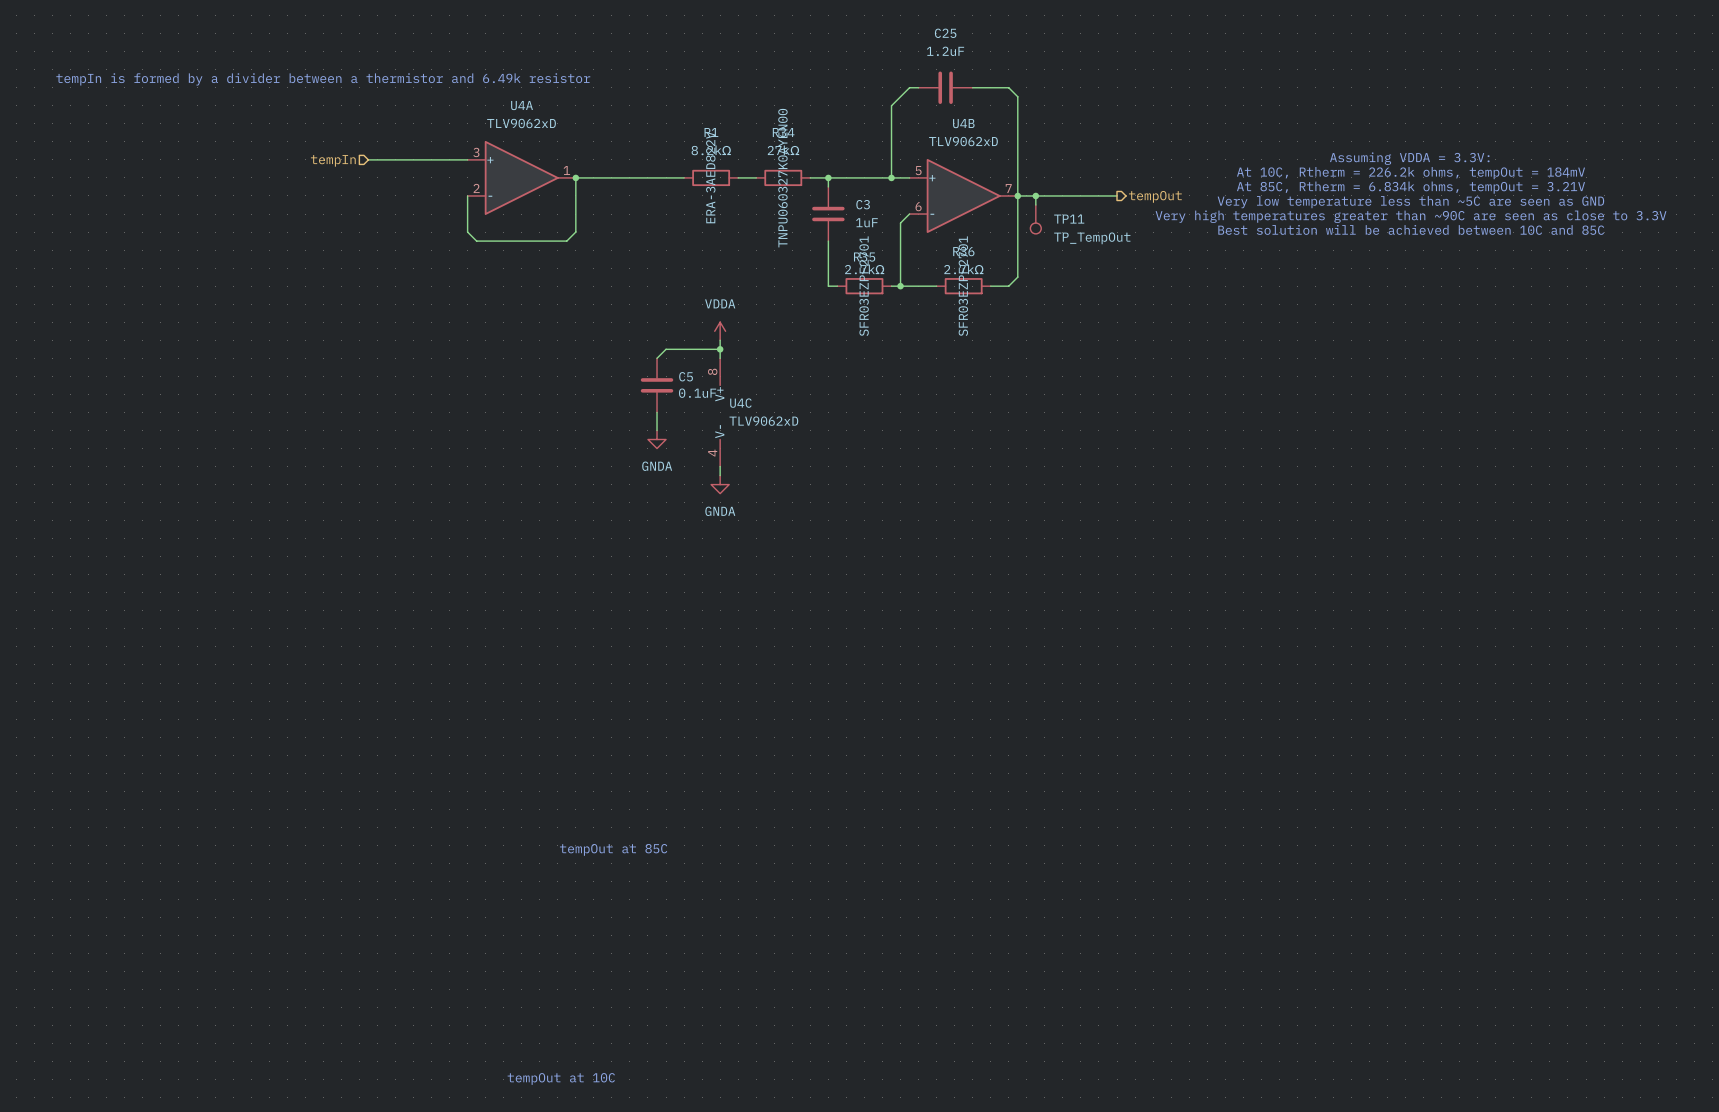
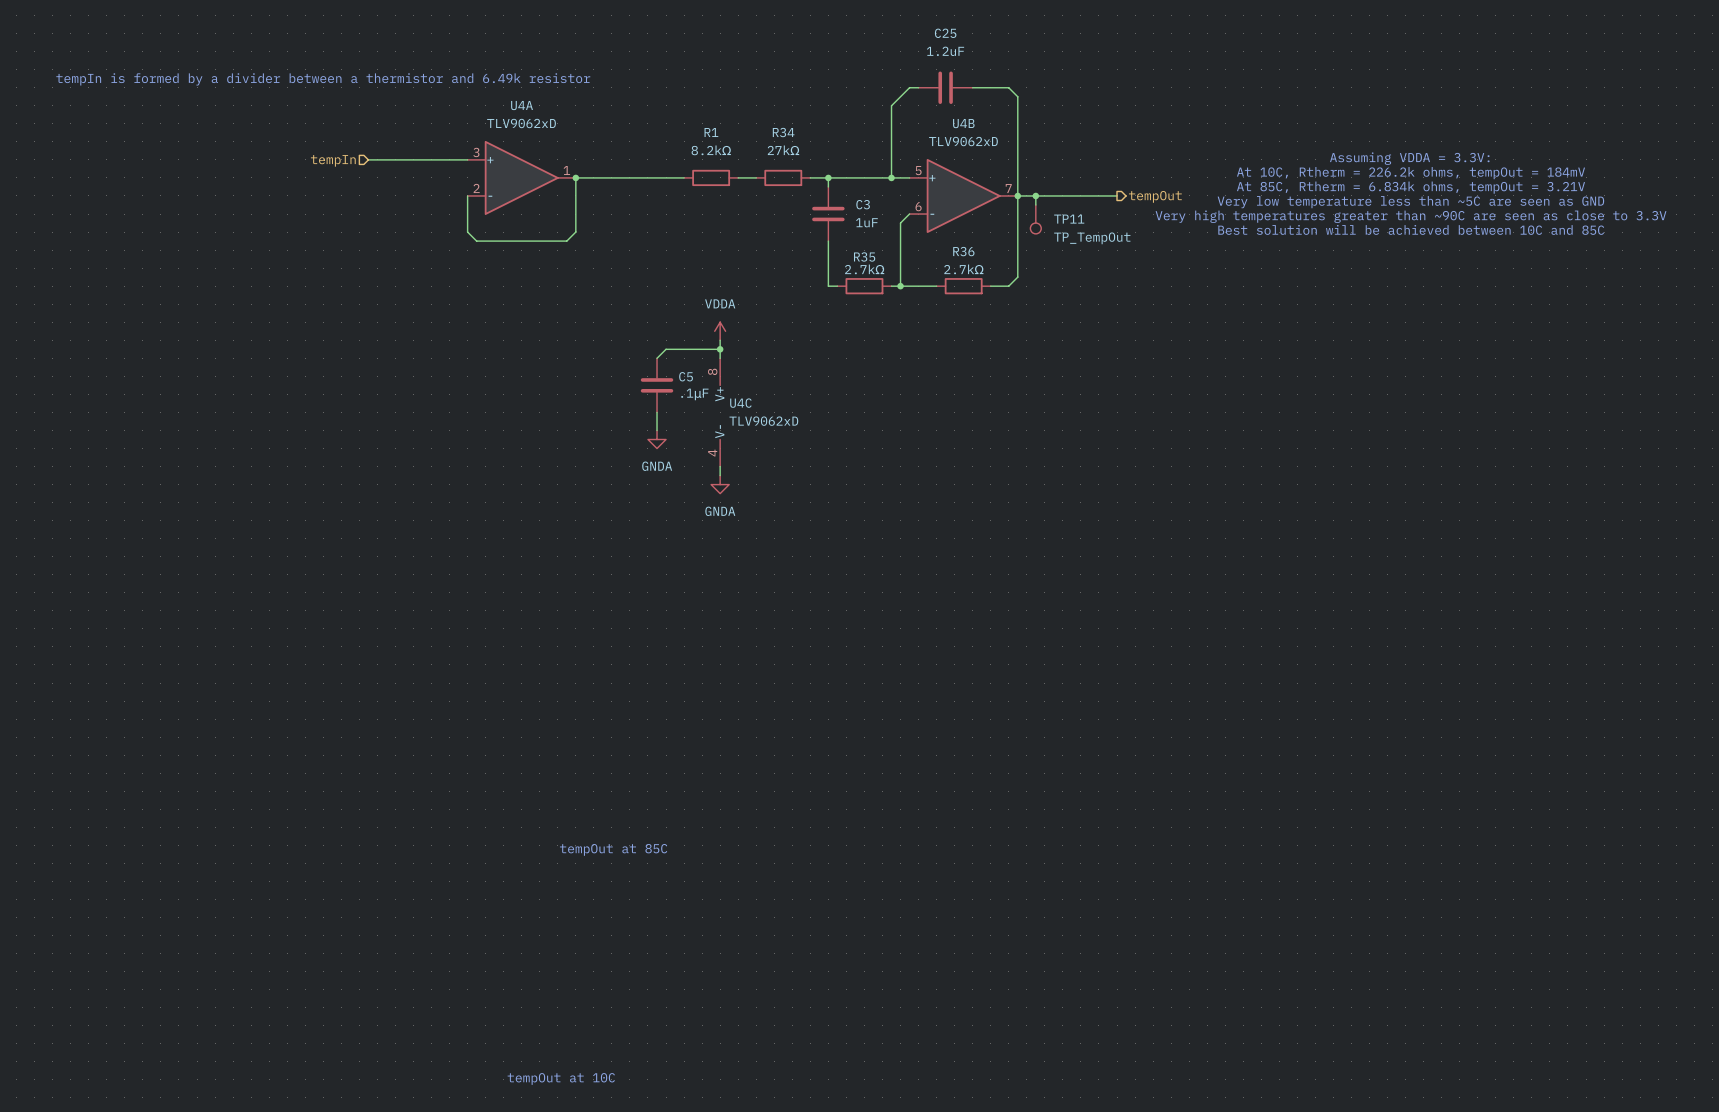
R1 text: ERA-3AED822V (710, 177) -> none
R34 text: TNPU060327K0AYEN00 (782, 178) -> none
R35 text: SFR03EZPF2701 (864, 286) -> none
R36 text: SFR03EZPF2701 (963, 286) -> none
C5 value: 0.1uF (697, 393) -> .1μF (694, 394)

